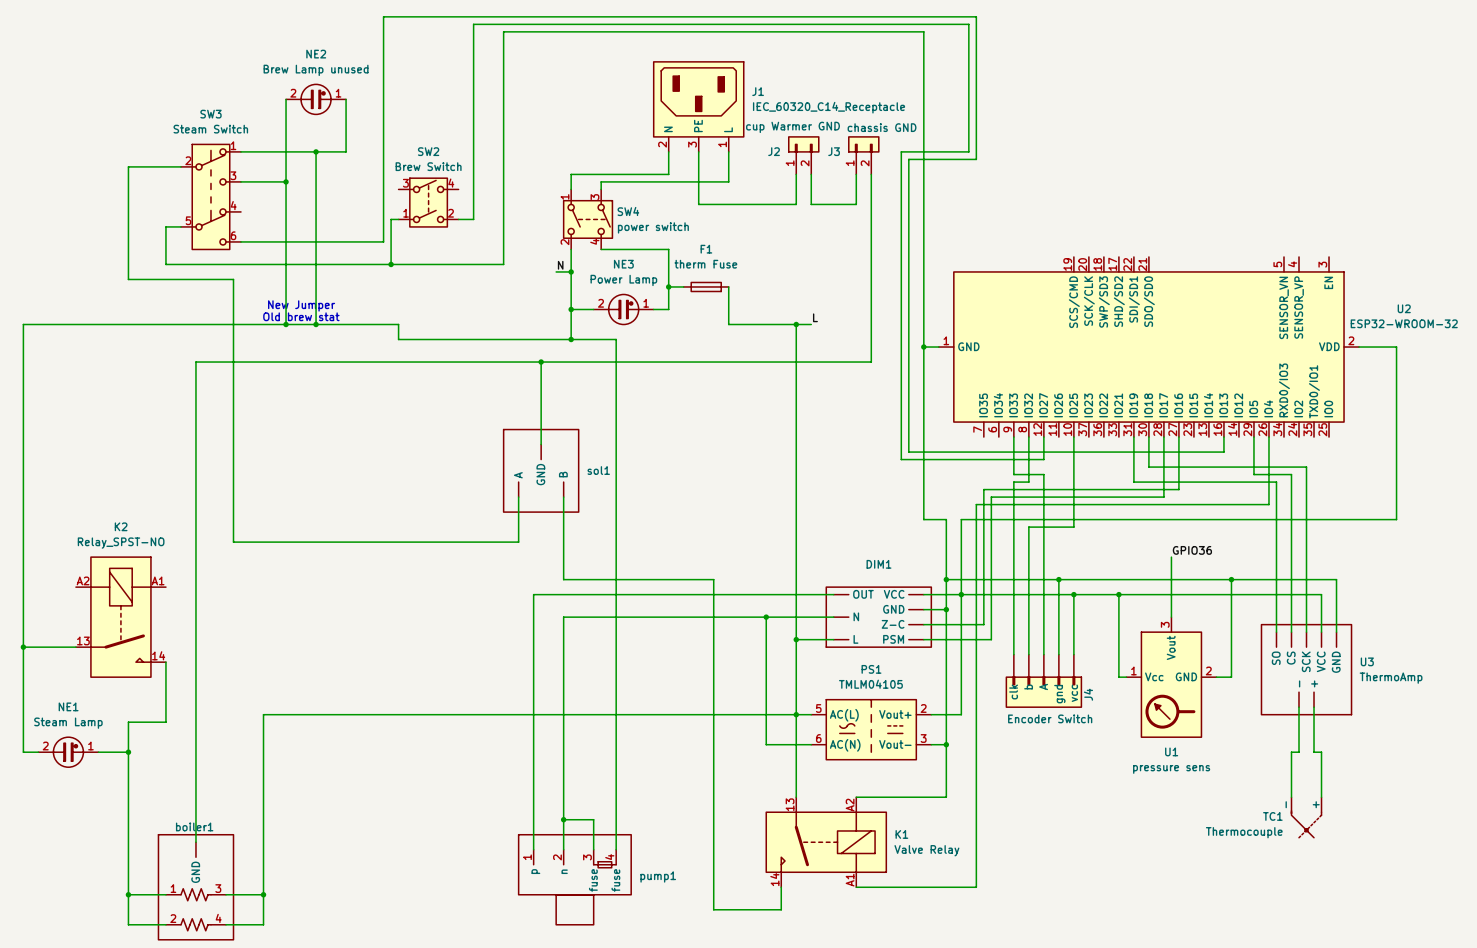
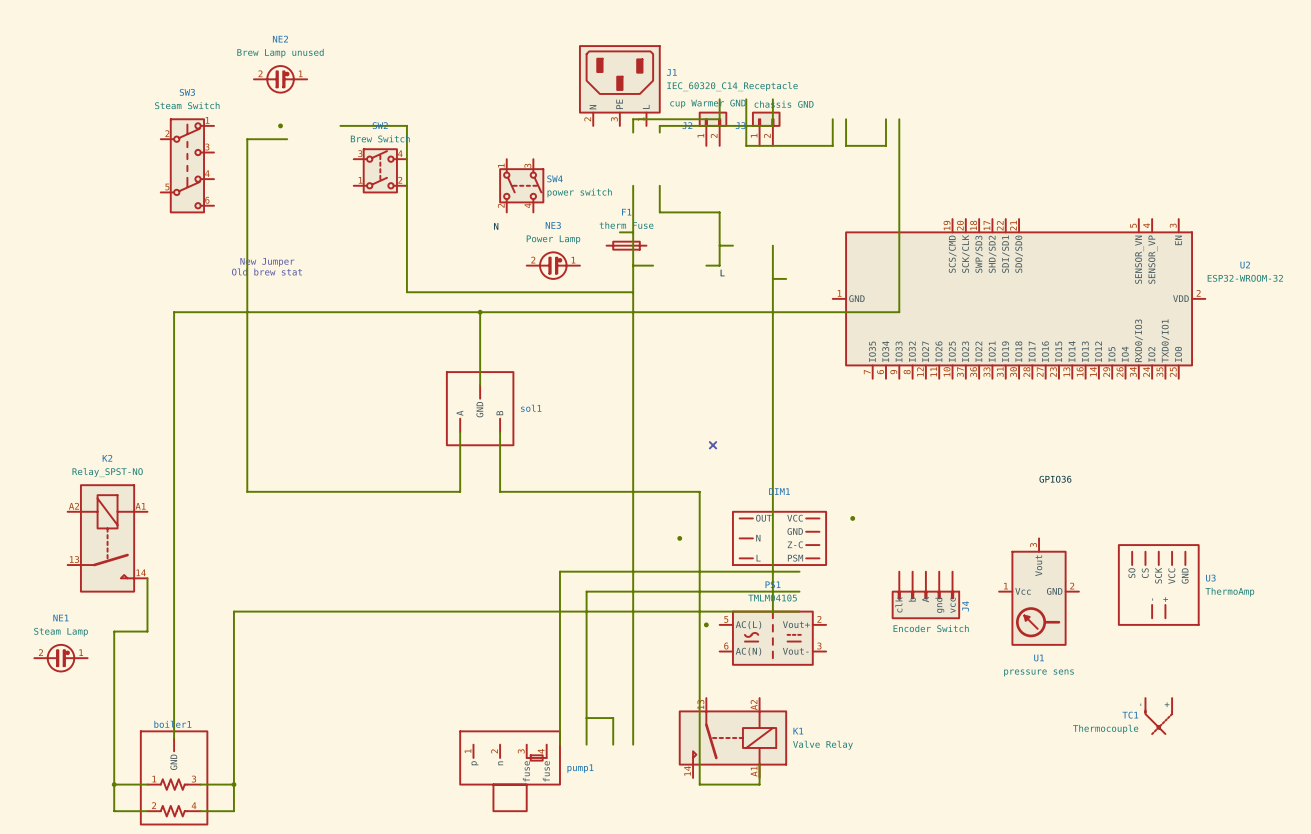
wire: (286, 99) (286, 324) -> none
wire: (346, 99) (346, 151) (241, 151) -> none
wire: none -> (899, 119) (899, 312) (772, 312) (772, 611)
wire: (316, 151) (316, 324) -> none
wire: (668, 151) (668, 174) (571, 174) (571, 189) -> (719, 99) (719, 119) (633, 119) (633, 132)
wire: (698, 151) (698, 204) (796, 204) (796, 174) -> (746, 99) (746, 145) (832, 145) (832, 119)
wire: (728, 151) (728, 181) (601, 181) (601, 189) -> (772, 99) (772, 125) (659, 125) (659, 132)
wire: (180, 166) (128, 166) (128, 279) (233, 279) (233, 542) (518, 542) -> (287, 139) (247, 139) (247, 491) (460, 491) (460, 471)
wire: (811, 174) (811, 204) (856, 204) (856, 174) -> (846, 119) (846, 145) (885, 145) (885, 119)
wire: (871, 174) (871, 286) -> none
wire: (241, 181) (286, 181) -> none
junction: (286, 181) -> none
wire: (398, 219) (391, 219) (391, 264) -> none
wire: (458, 219) (473, 219) (473, 24) (968, 24) (968, 151) (901, 151) (901, 459) (1043, 459) (1043, 437) -> none
wire: none -> (633, 185) (633, 505)
wire: none -> (659, 185) (659, 212) (719, 212) (719, 265) (706, 265)
wire: (180, 226) (165, 226) (165, 264) (503, 264) (503, 31) (923, 31) (923, 519) (946, 519) (946, 797) (856, 797) -> none
wire: (241, 241) (383, 241) (383, 16) (976, 16) (976, 159) (908, 159) (908, 452) (1223, 452) (1223, 437) -> none
wire: (571, 249) (571, 339) -> none
wire: (601, 249) (668, 249) (668, 309) (653, 309) -> none
junction: (391, 264) -> none
wire: (556, 271) (571, 271) -> (619, 232) (633, 232)
junction: (571, 271) -> none
wire: (668, 286) (683, 286) -> (719, 245) (732, 245)
junction: (668, 286) -> none
wire: (728, 286) (728, 324) (811, 324) -> none
wire: (571, 309) (593, 309) -> (633, 265) (653, 265)
junction: (571, 309) -> none
junction: (286, 324) -> none
junction: (316, 324) -> none
wire: (796, 324) (796, 797) -> none
junction: (796, 324) -> none
wire: (458, 339) (398, 339) (398, 324) (23, 324) (23, 752) (38, 752) -> (406, 292) (406, 125) (340, 125)
junction: (571, 339) -> none
wire: (616, 339) (616, 849) -> (546, 292) (633, 292)
wire: (923, 347) (938, 347) -> (772, 278) (786, 278)
junction: (923, 347) -> none
wire: (1359, 347) (1396, 347) (1396, 519) (961, 519) (961, 714) (931, 714) -> none
wire: (1013, 437) (1013, 474) (1043, 474) (1043, 654) -> none
wire: (1028, 437) (1028, 482) (1013, 482) (1013, 654) -> none
wire: (1073, 437) (1073, 527) (1028, 527) (1028, 654) -> none
wire: (1133, 437) (1133, 482) (1276, 482) (1276, 632) -> none
wire: (1148, 437) (1148, 467) (1306, 467) (1306, 632) -> none
wire: (1163, 437) (1163, 497) (991, 497) (991, 639) (923, 639) -> none
wire: (1178, 437) (1178, 489) (983, 489) (983, 624) (923, 624) -> none
wire: (1253, 437) (1253, 474) (1291, 474) (1291, 632) -> none
wire: (1268, 437) (1268, 504) (976, 504) (976, 887) (856, 887) -> none
no-connect mark: none -> (713, 445)
wire: (1171, 557) (1171, 617) -> none
wire: (563, 564) (563, 579) (713, 579) -> (500, 491) (699, 491) (699, 784) (759, 784) (759, 764)
wire: (946, 579) (1336, 579) (1336, 632) -> none
junction: (946, 579) -> none
wire: (1058, 579) (1058, 654) -> none
junction: (1058, 579) -> none
wire: (1231, 579) (1231, 677) (1216, 677) -> none
junction: (1231, 579) -> none
wire: (833, 594) (533, 594) (533, 849) -> none
wire: (923, 594) (1321, 594) (1321, 632) -> none
wire: (1073, 594) (1073, 654) -> none
junction: (1073, 594) -> none
wire: (1118, 594) (1118, 677) (1126, 677) -> none
junction: (1118, 594) -> none
wire: (923, 609) (946, 609) -> none
junction: (946, 609) -> none
wire: (766, 617) (766, 744) (811, 744) -> none
wire: (833, 617) (563, 617) (563, 849) -> none
wire: (796, 639) (833, 639) -> none
junction: (796, 639) -> none
wire: (23, 647) (75, 647) -> none
junction: (23, 647) -> none
wire: none -> (799, 571) (559, 571) (559, 744)
wire: none -> (799, 591) (586, 591) (586, 744)
wire: (1299, 707) (1299, 752) (1291, 752) (1291, 797) -> none
wire: (1314, 707) (1314, 752) (1321, 752) (1321, 797) -> none
wire: (263, 714) (811, 714) -> (233, 624) (233, 611) (799, 611)
wire: (931, 744) (946, 744) -> none
junction: (946, 744) -> none
wire: (98, 752) (128, 752) -> none
junction: (128, 752) -> none
wire: (563, 819) (593, 819) (593, 849) -> (586, 718) (613, 718) (613, 744)
junction: (563, 819) -> none
wire: (713, 849) (713, 909) (781, 909) (781, 887) -> none

